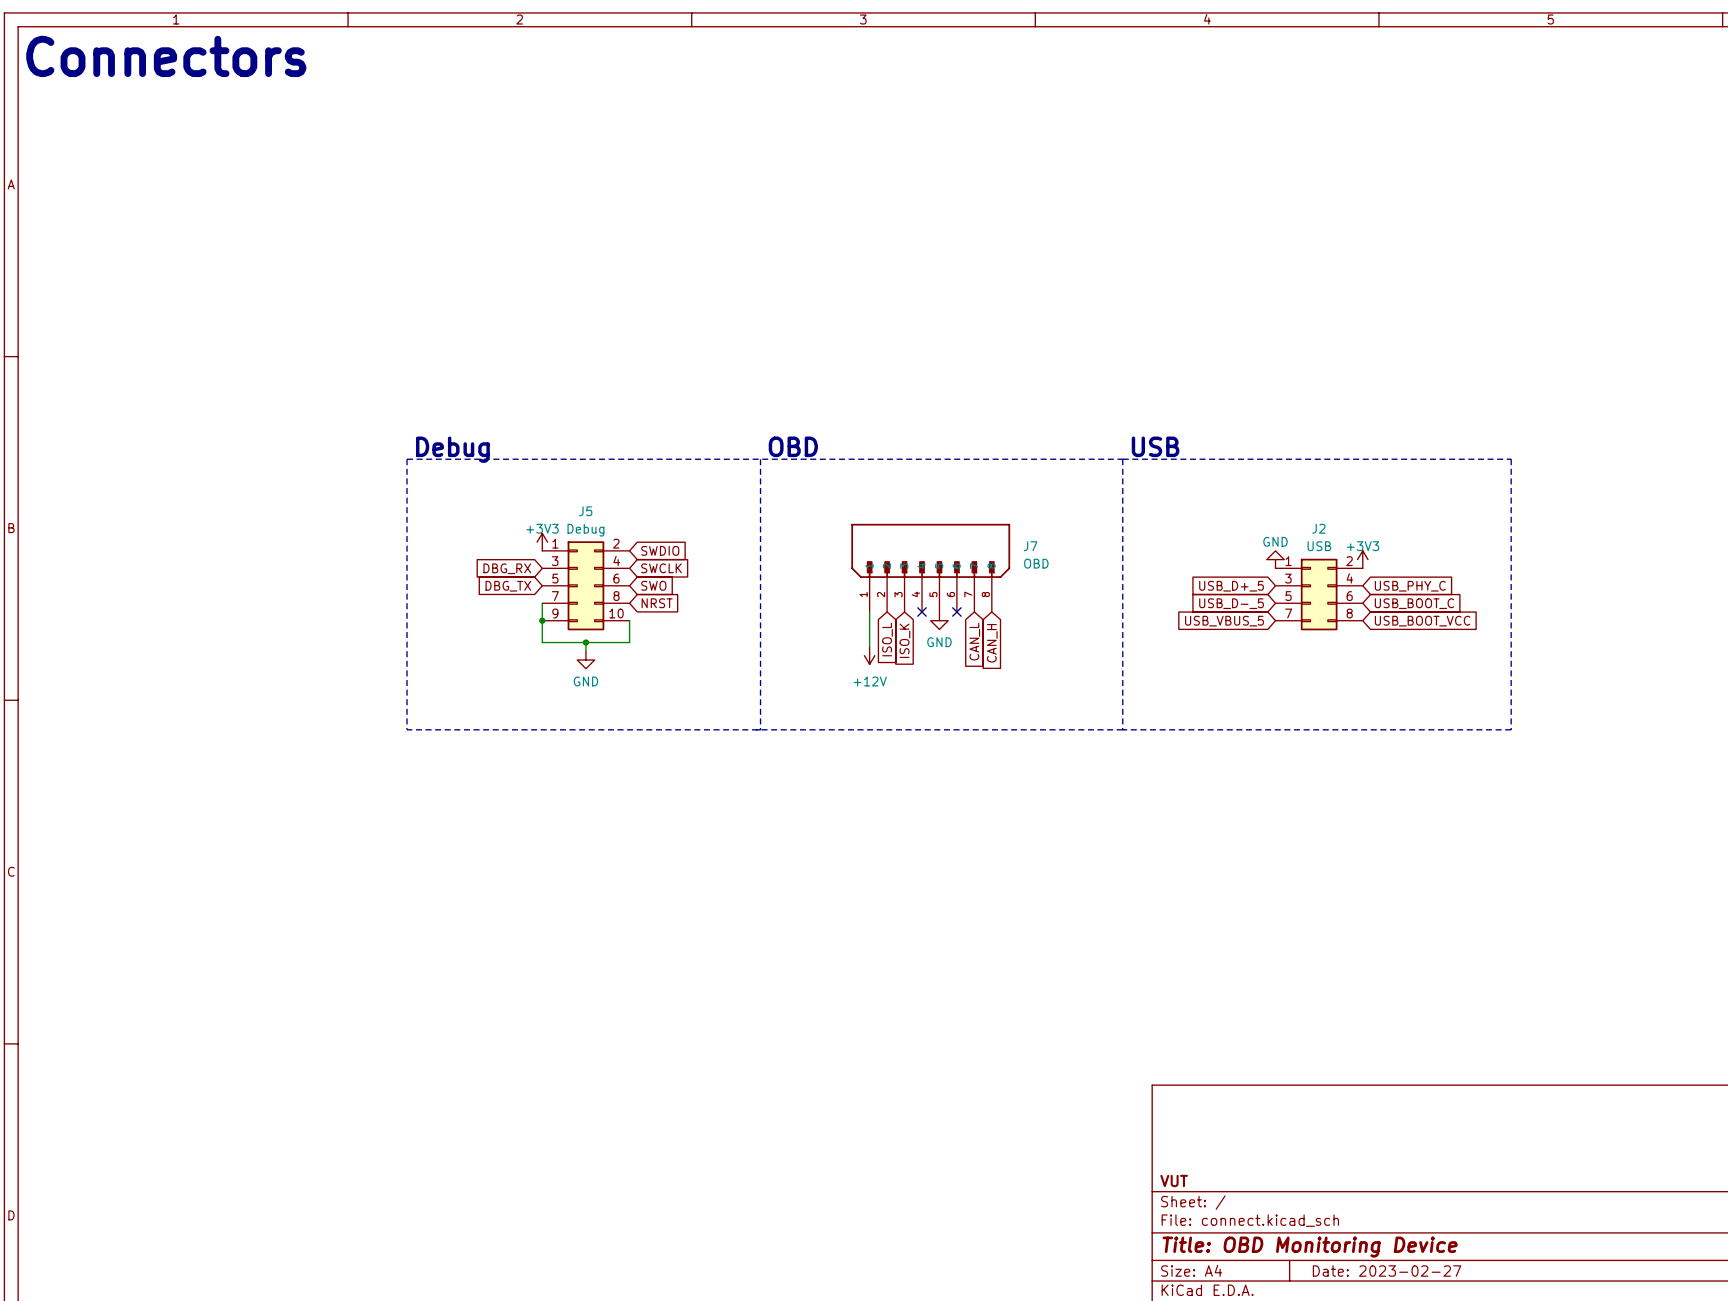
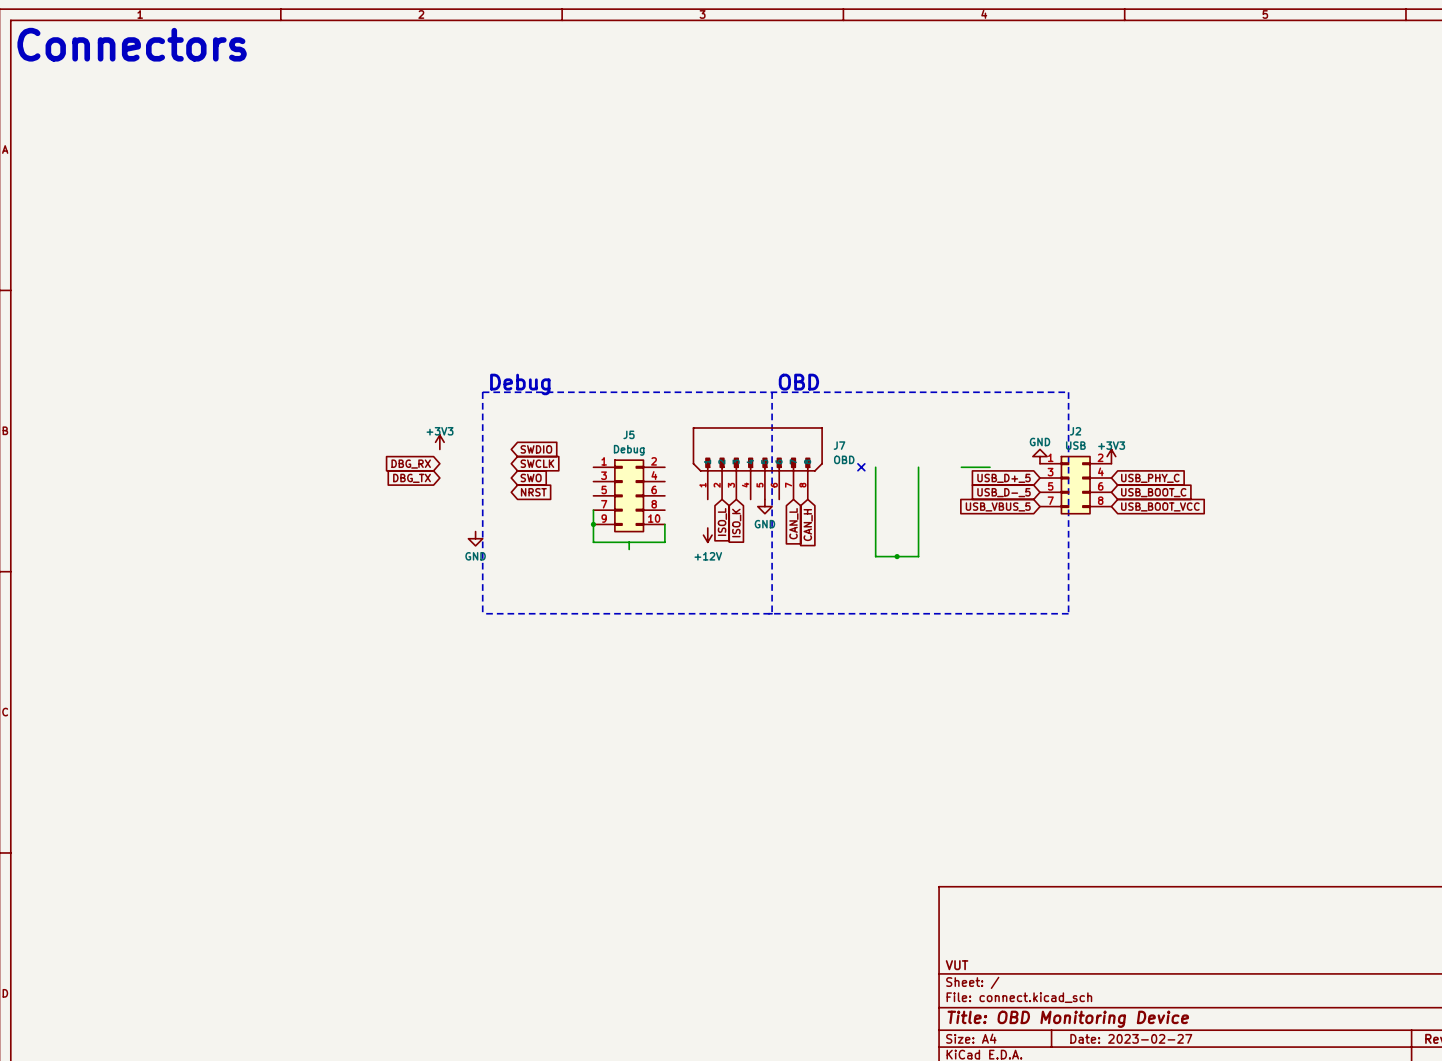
text: OBD (793, 446) -> none
text: USB (1155, 446) -> none
text: Debug (452, 449) -> none
line: (407, 459) (1511, 459) (1511, 729) (407, 729) (407, 459) -> (482, 392) (482, 613) (1068, 613) (1068, 392) (482, 392)
line: (760, 459) (760, 729) (756, 729) -> none
line: (1122, 459) (1122, 729) -> none
text: none -> OBD (798, 382)
text: none -> Debug (520, 384)
line: none -> (772, 392) (772, 613) (768, 613)
no-connect mark: none -> (861, 467)
wire: none -> (875, 467) (875, 556) (918, 556) (918, 467)
wire: none -> (961, 467) (989, 467)
J5 position: (585, 585) -> (629, 495)
wire: (542, 603) (542, 642) (629, 642) (629, 620) -> none
wire: (869, 611) (869, 646) -> none
no-connect mark: (922, 611) -> none
no-connect mark: (956, 611) -> none
junction: (542, 620) -> none
wire: none -> (593, 510) (593, 542) (664, 542) (664, 524)
wire: (585, 642) (585, 651) -> none
junction: (585, 642) -> none
junction: none -> (593, 524)
wire: none -> (629, 542) (629, 549)
junction: none -> (897, 556)

